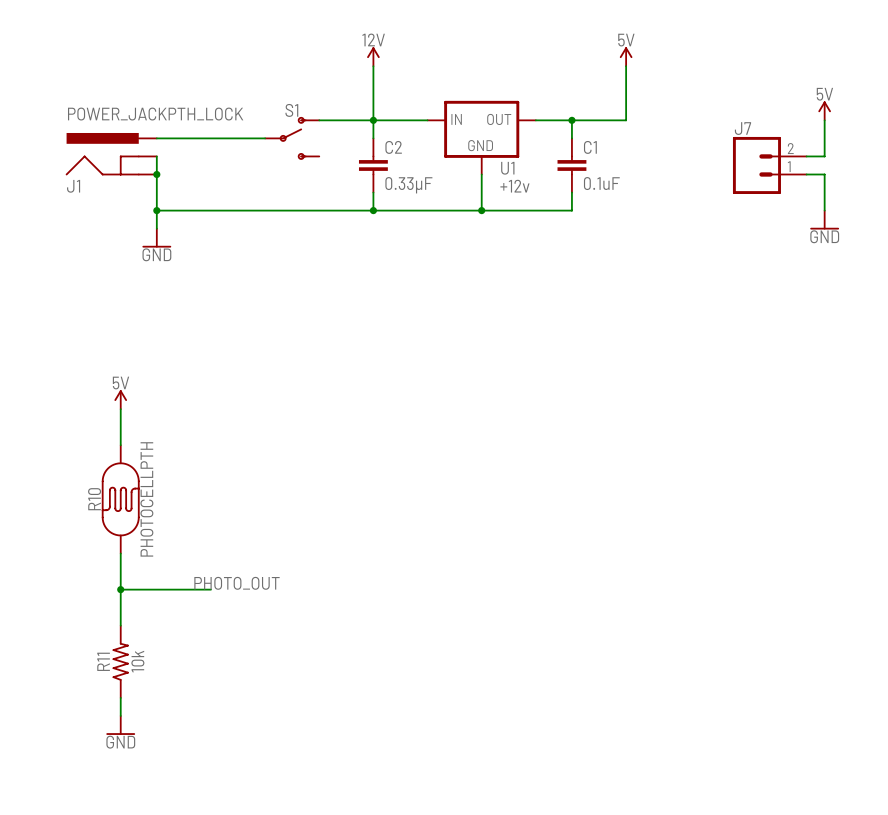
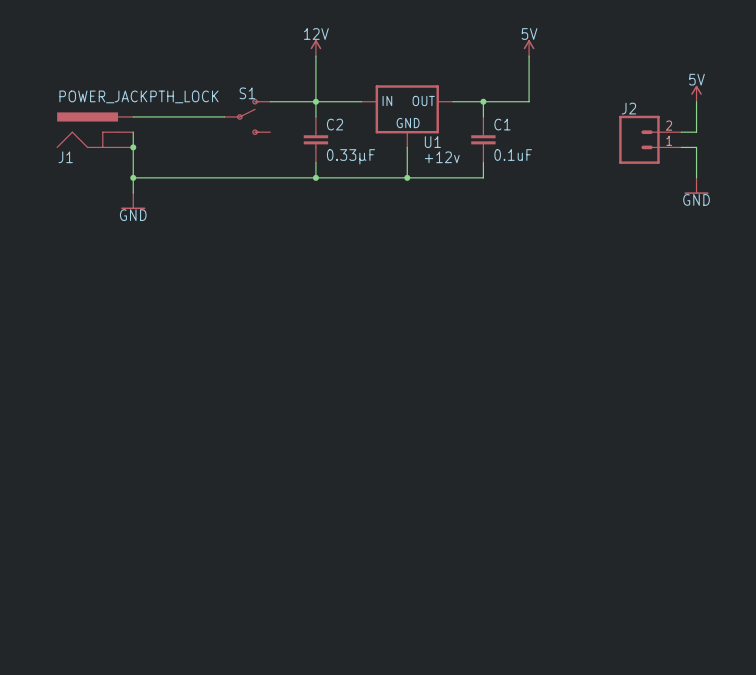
J7 name: J7 (742, 128) -> J2 (628, 108)
power symbol: 5V (120, 399) -> none
wire: (120, 409) (120, 445) -> none
R10: PHOTOCELLPTH (120, 499) -> none
wire: (120, 553) (120, 625) -> none
label: PHOTO_OUT (236, 583) -> none
wire: (120, 589) (210, 589) -> none
junction: (120, 589) -> none
R11: 10k (120, 661) -> none
wire: (120, 697) (120, 715) -> none
power symbol: GND (120, 725) -> none

